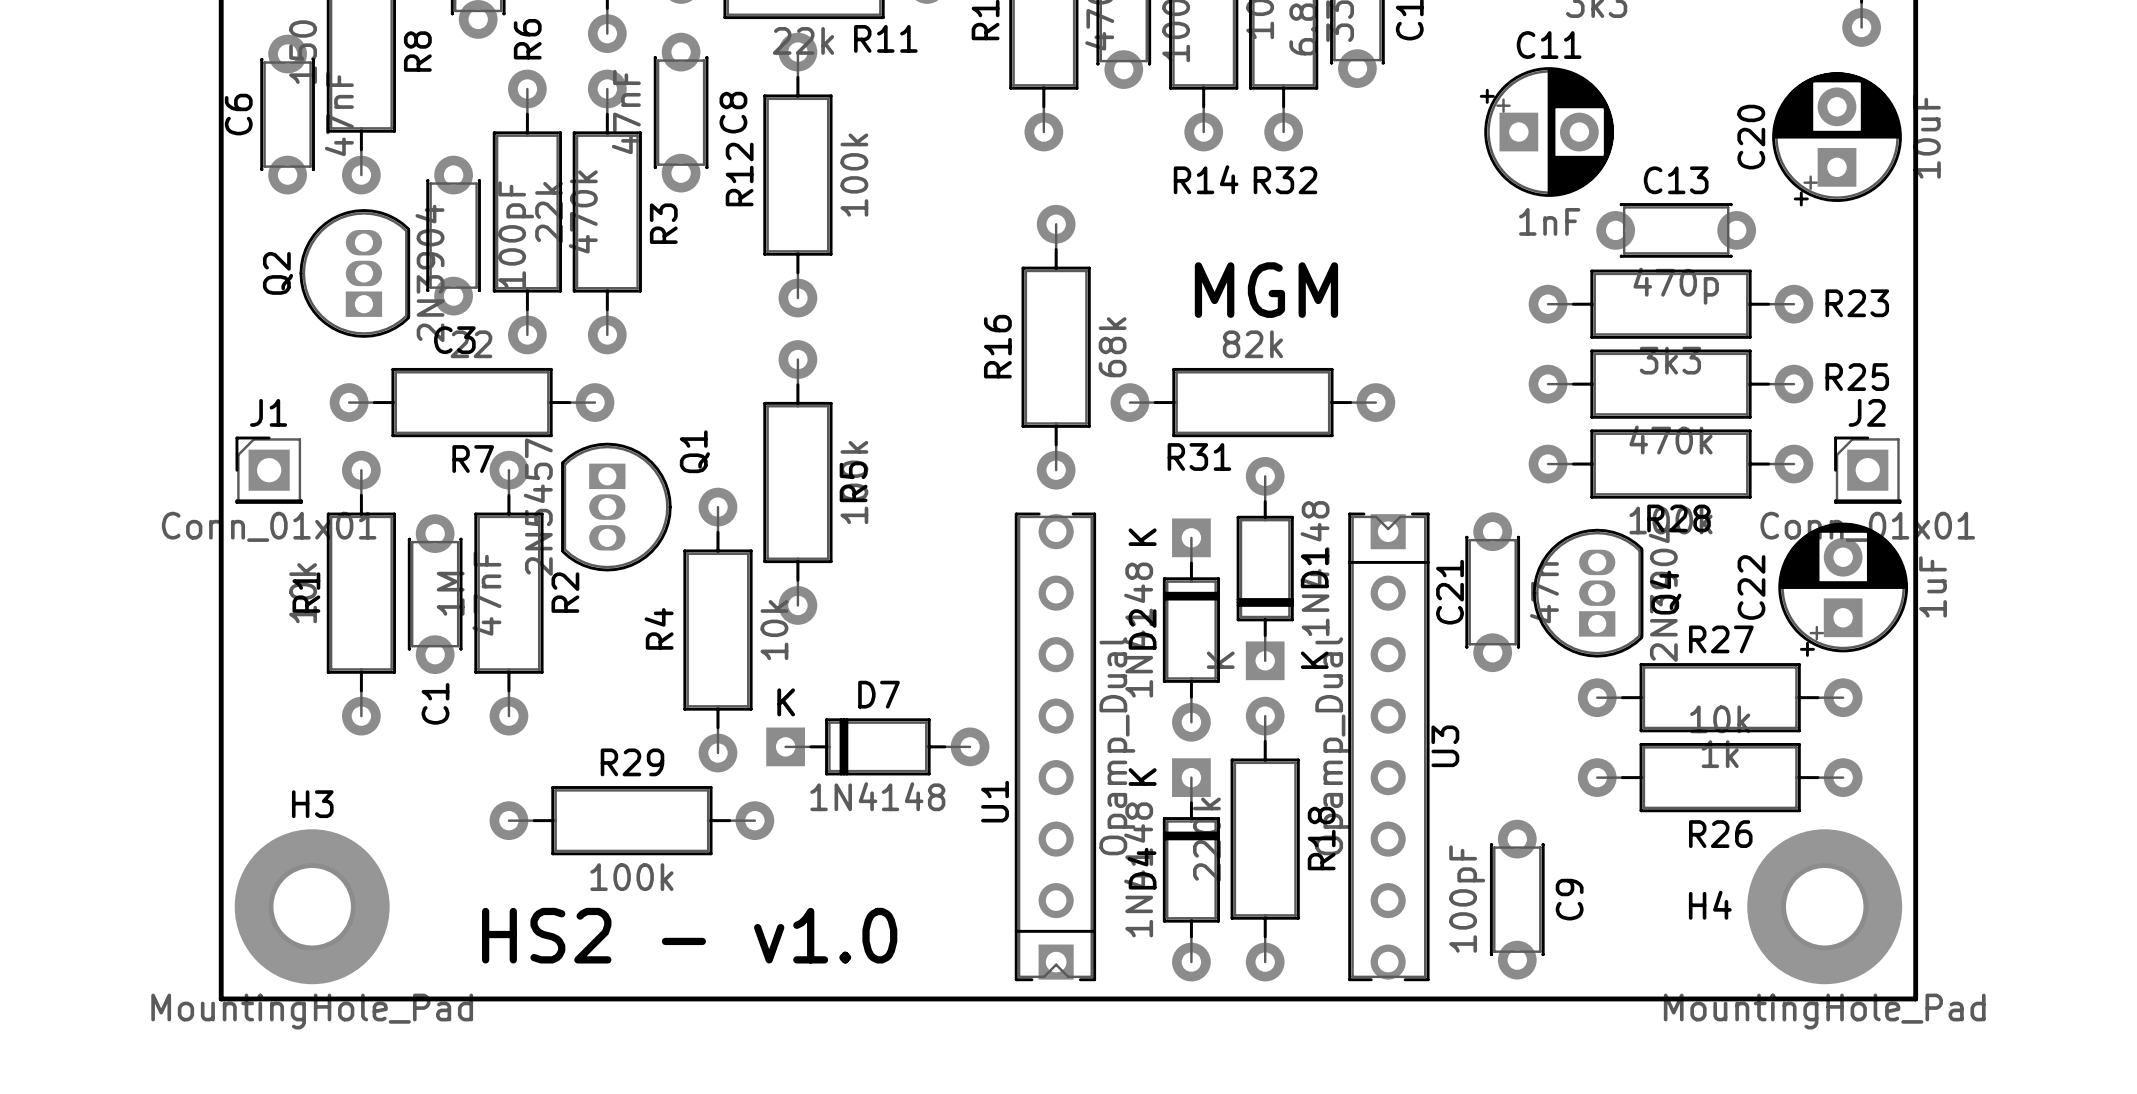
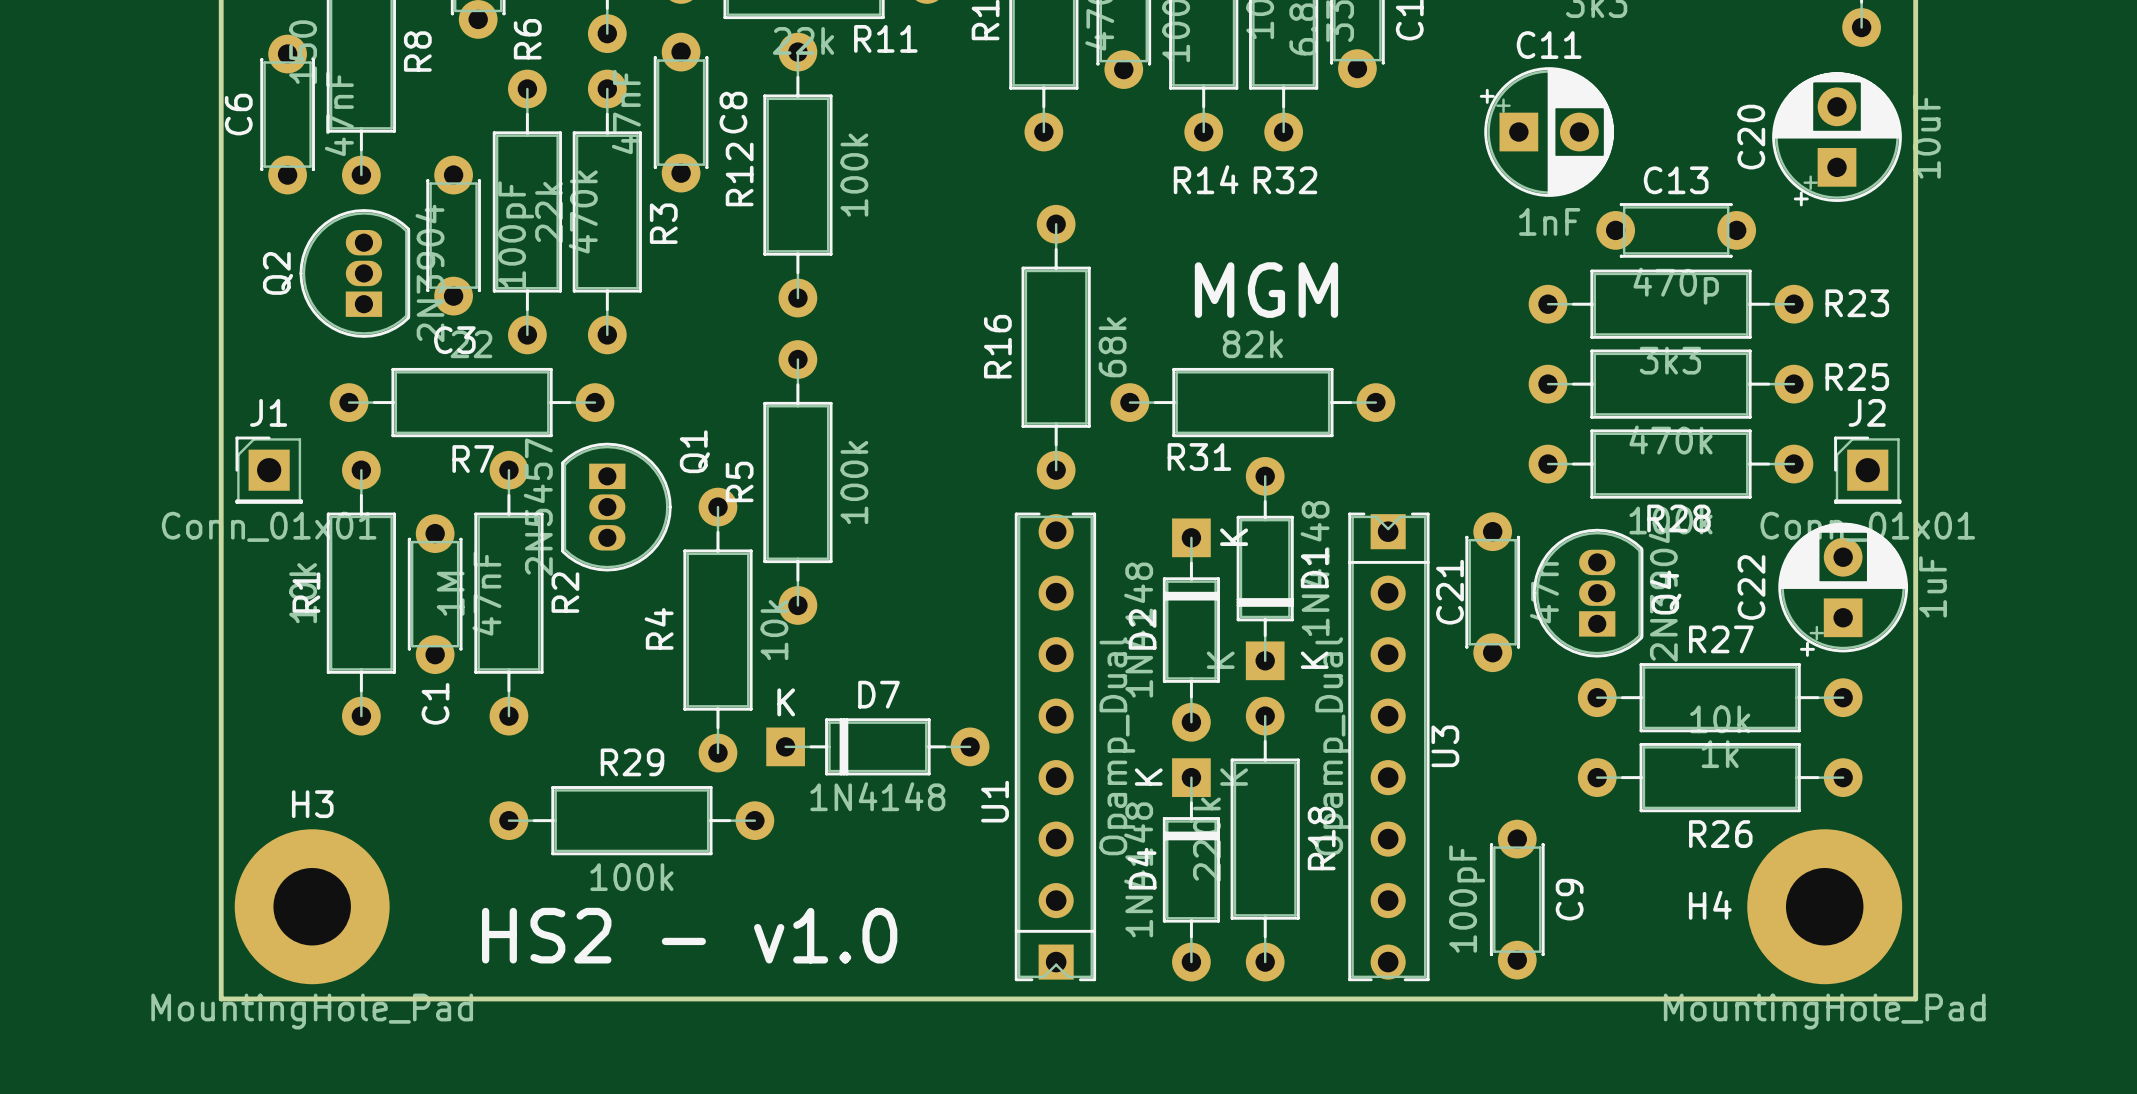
R5 name position: R5 (853, 481) -> R5 (739, 481)
D2 footprint: [1162, 518, 1220, 742] -> [1162, 518, 1220, 742]
D4 footprint: [1162, 758, 1220, 982] -> [1162, 758, 1220, 982]

